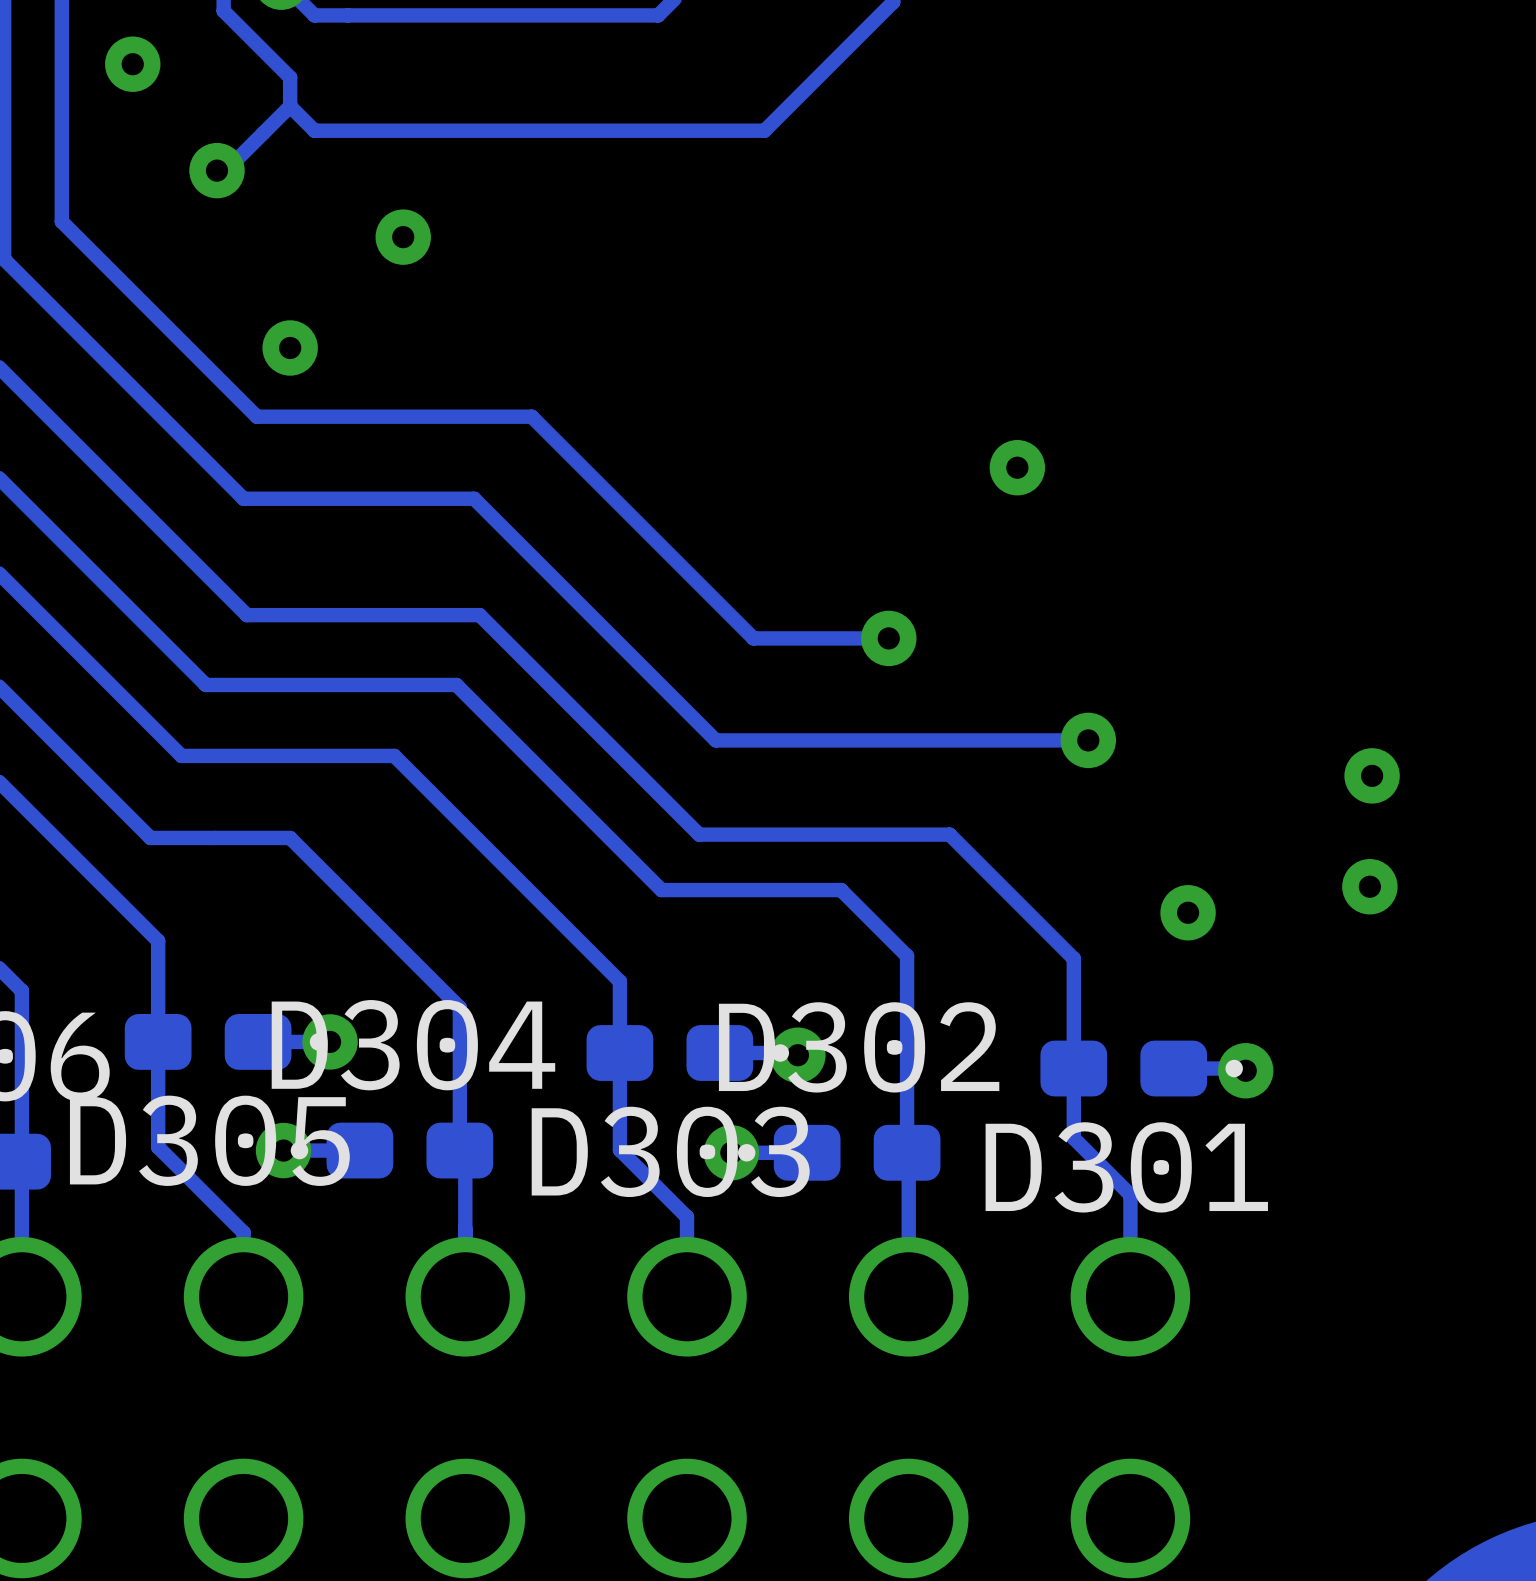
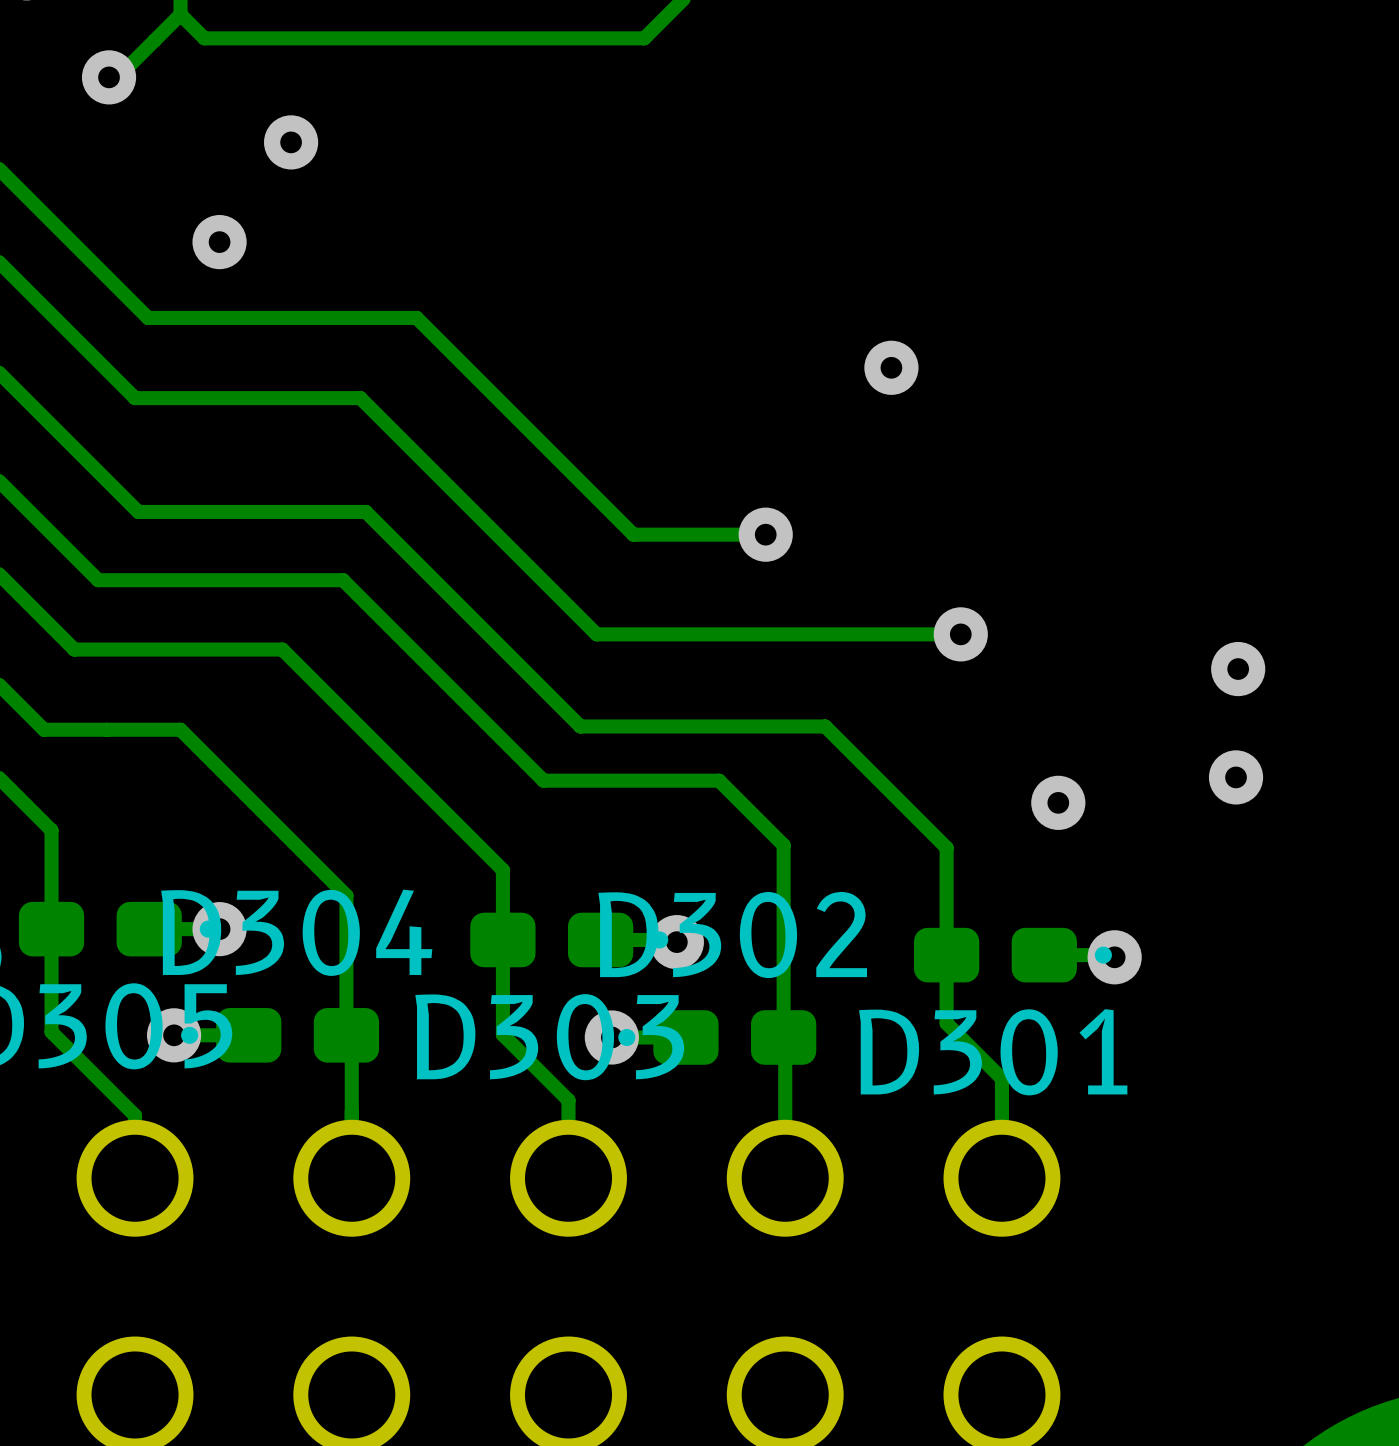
via position: (290, 347) -> (219, 242)

